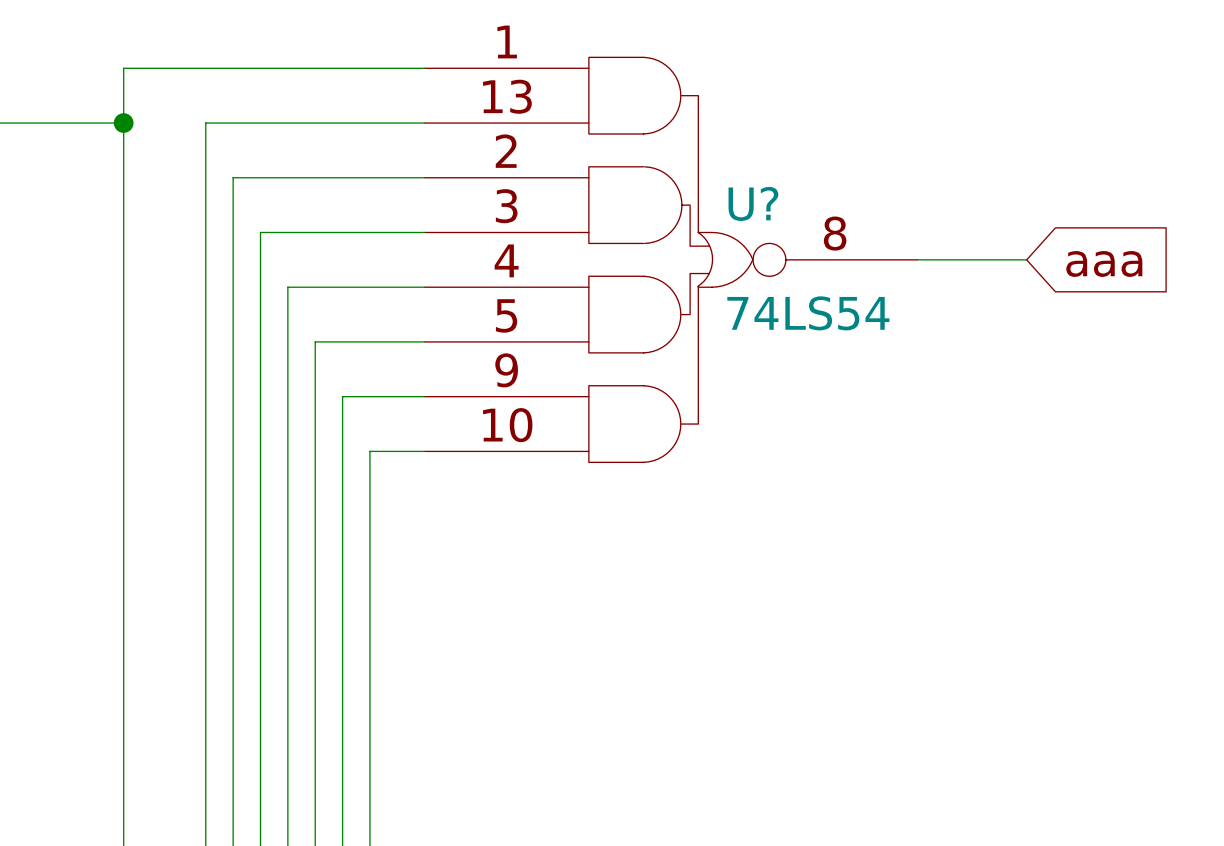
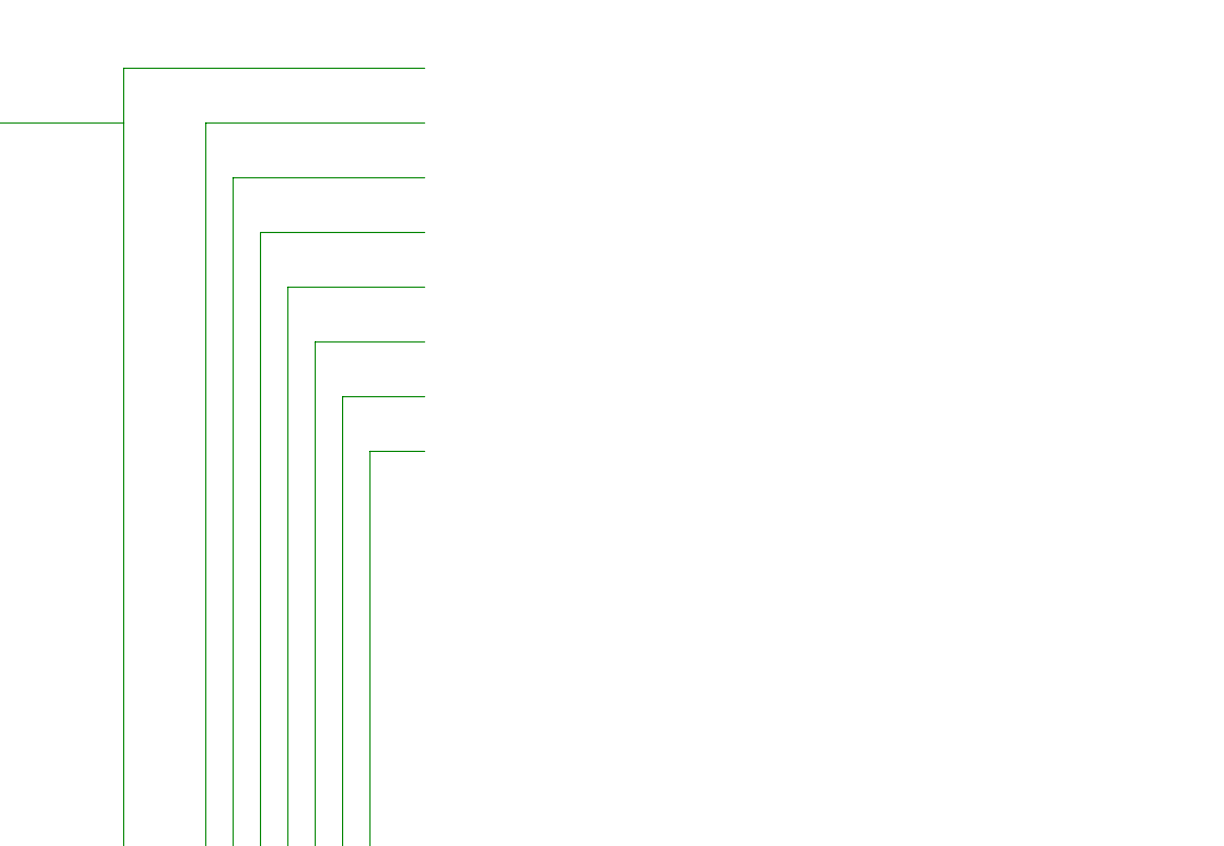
junction: (123, 123) -> none
U?: 74LS54 (670, 259) -> none
wire: (917, 259) (1026, 259) -> none
global label: aaa (1104, 263) -> none

